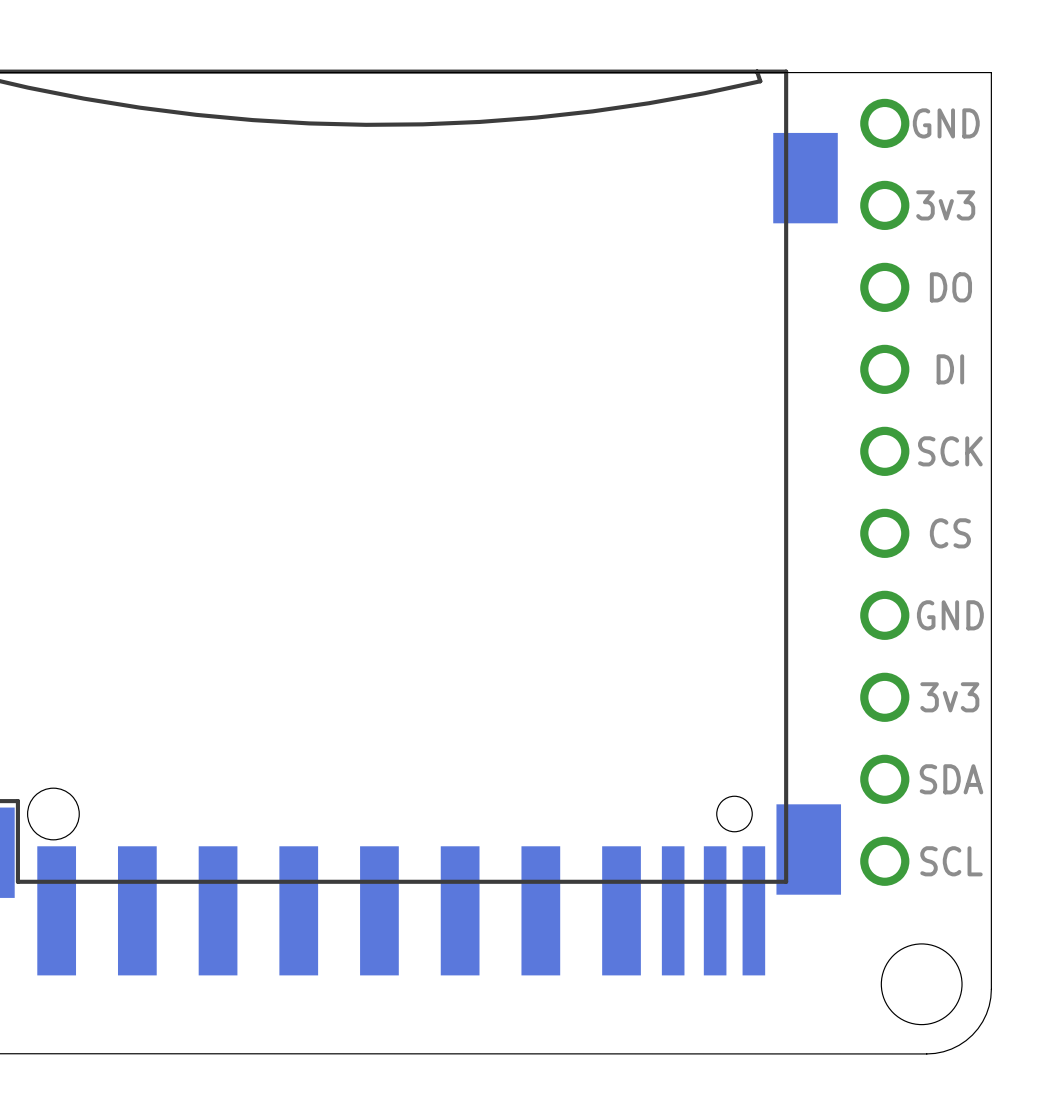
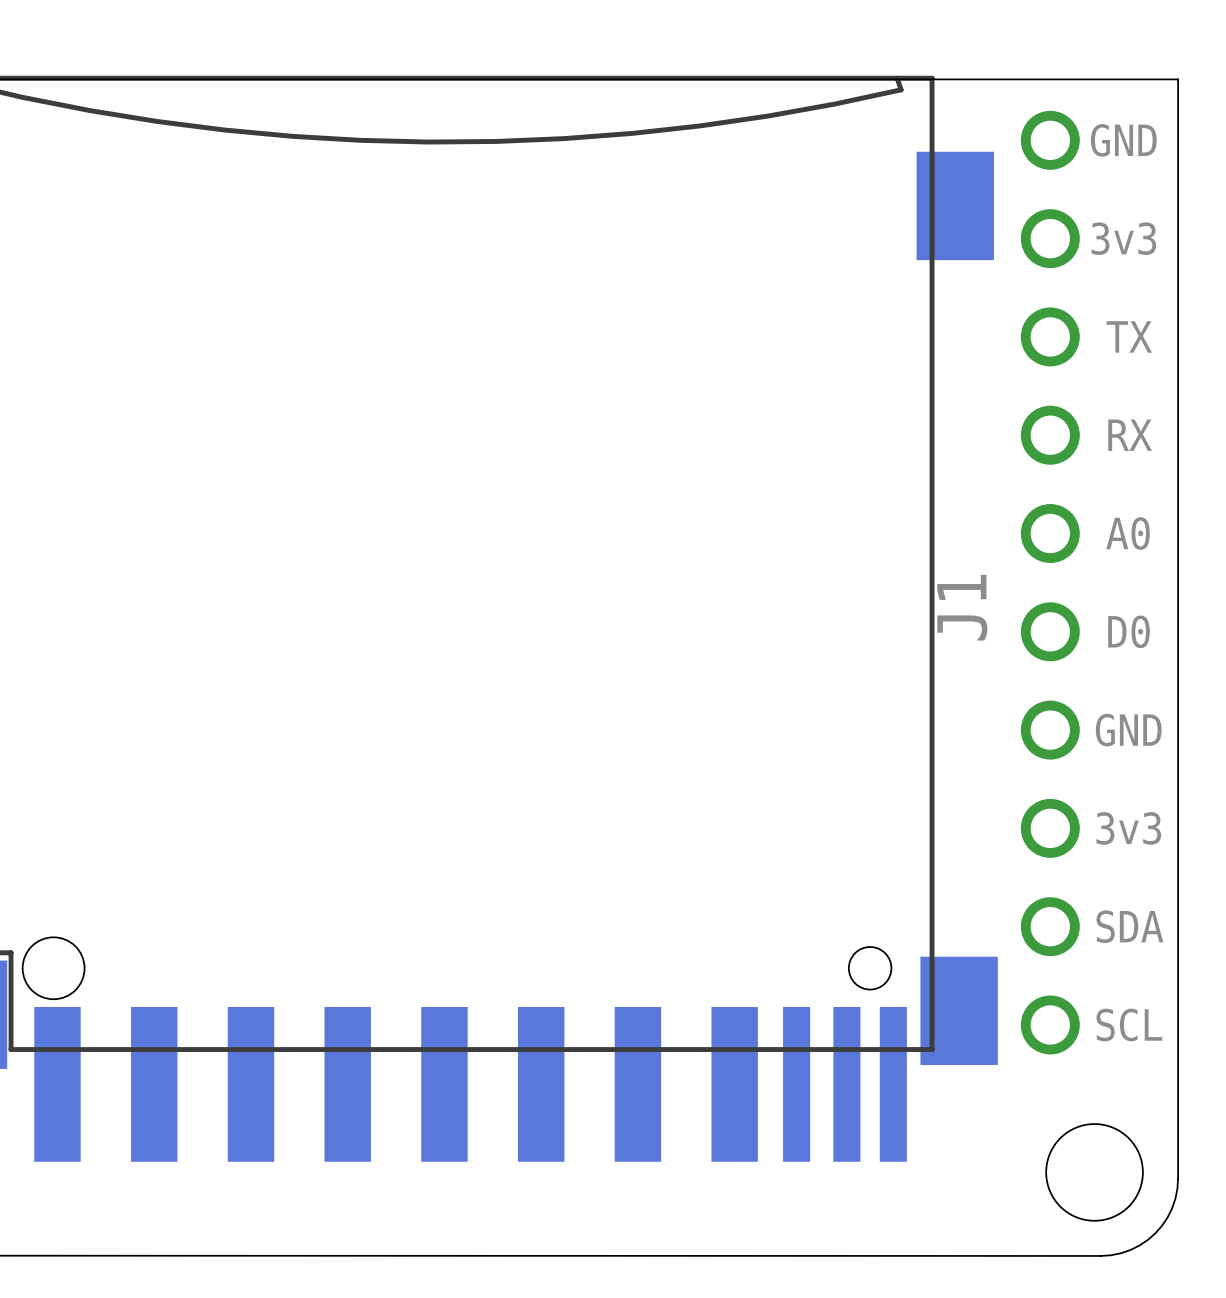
text: DO (950, 287) -> TX (1129, 336)
text: DI (950, 369) -> RX (1130, 435)
text: SCK (950, 451) -> A0 (1128, 533)
J1 name: none -> J1 (962, 607)
text: CS (950, 533) -> D0 (1128, 631)

